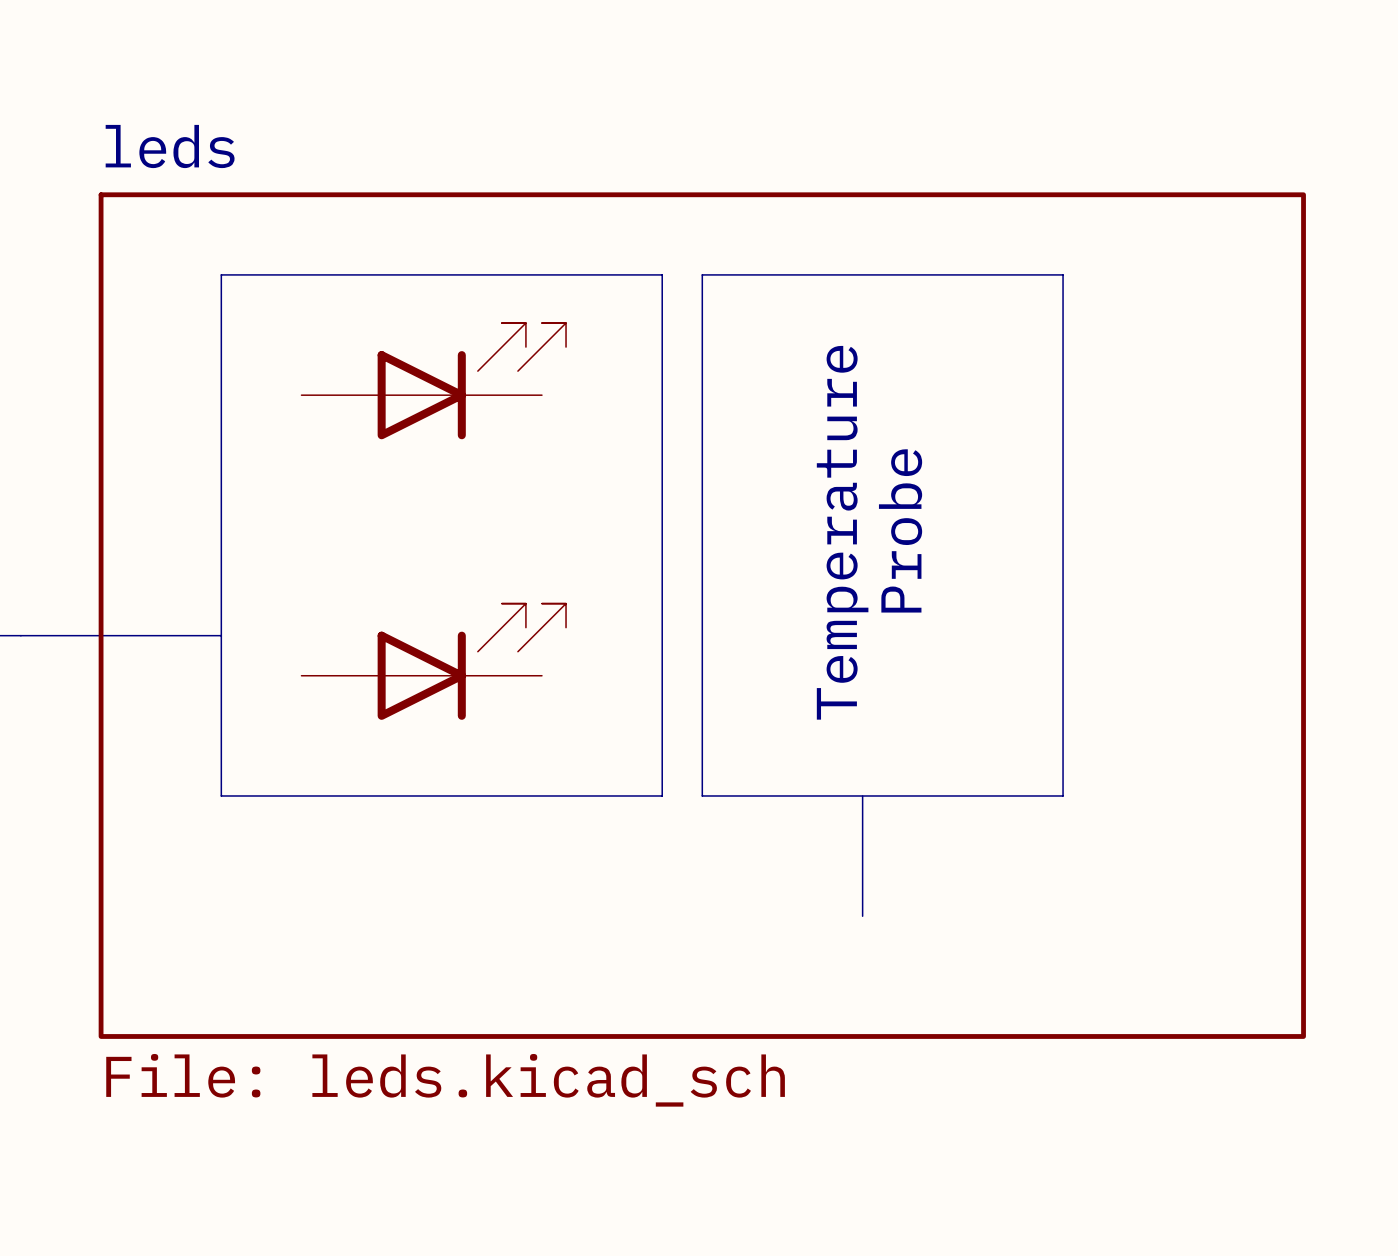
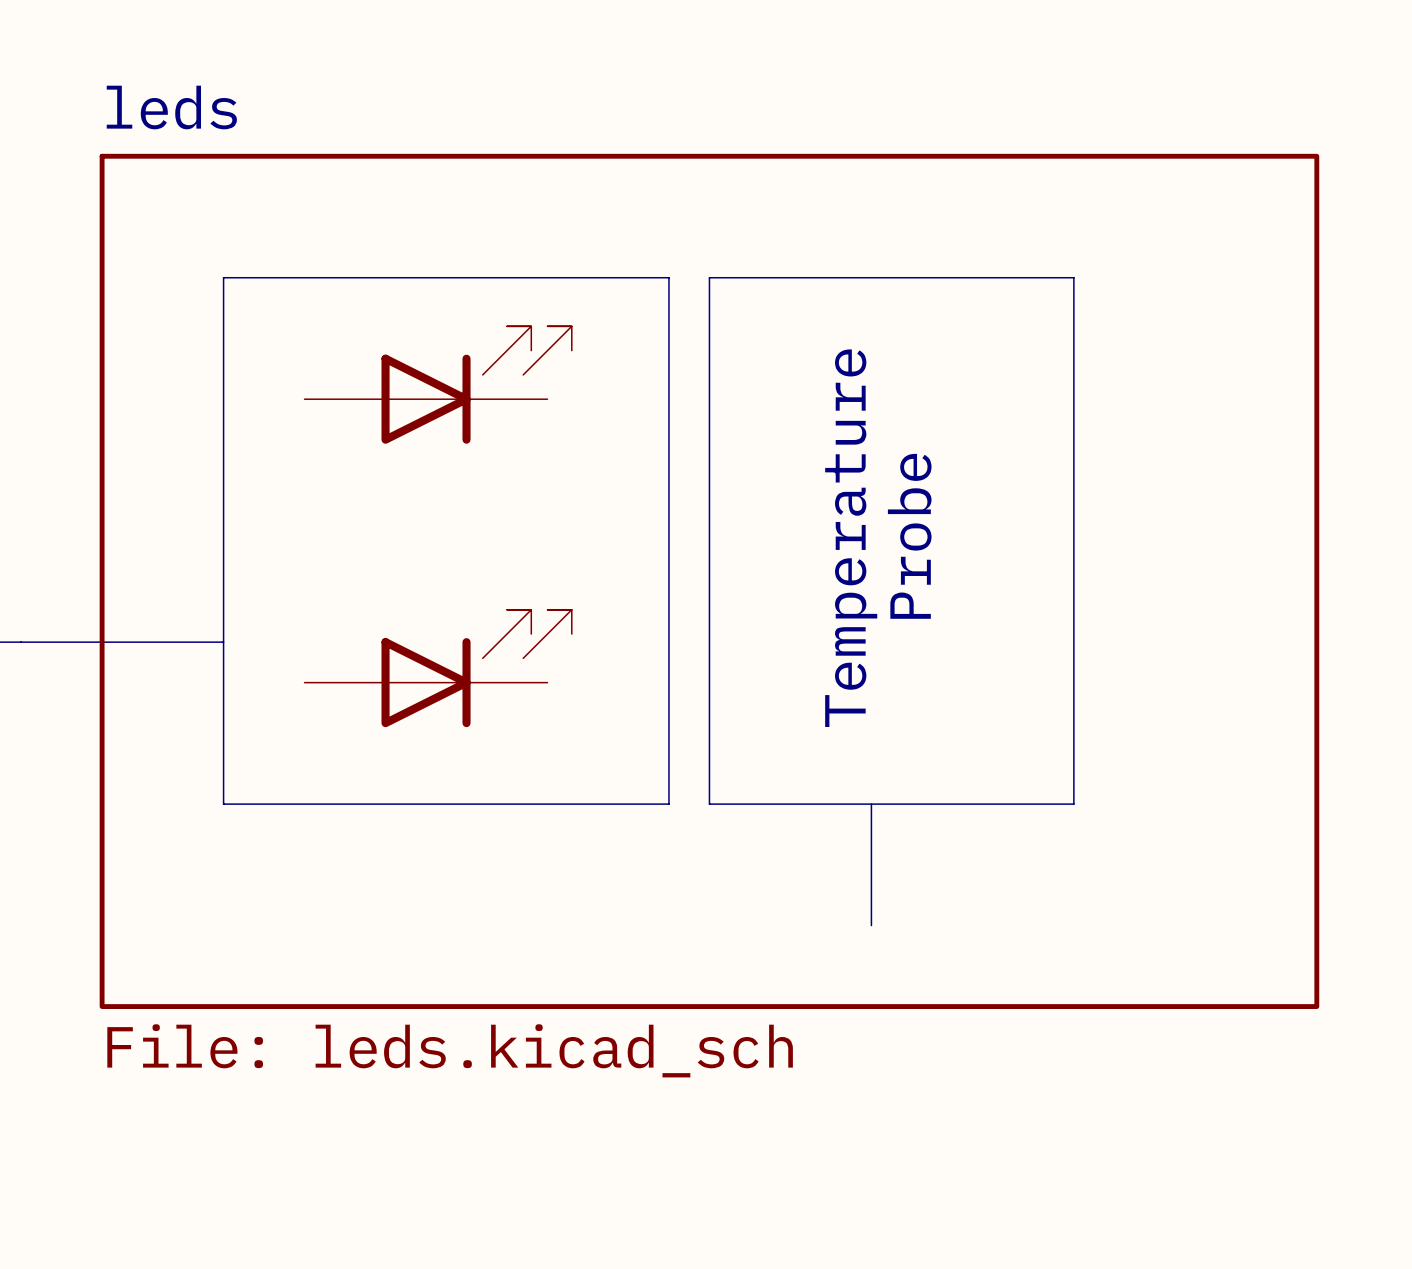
sheet leds position: (702, 615) -> (709, 581)

